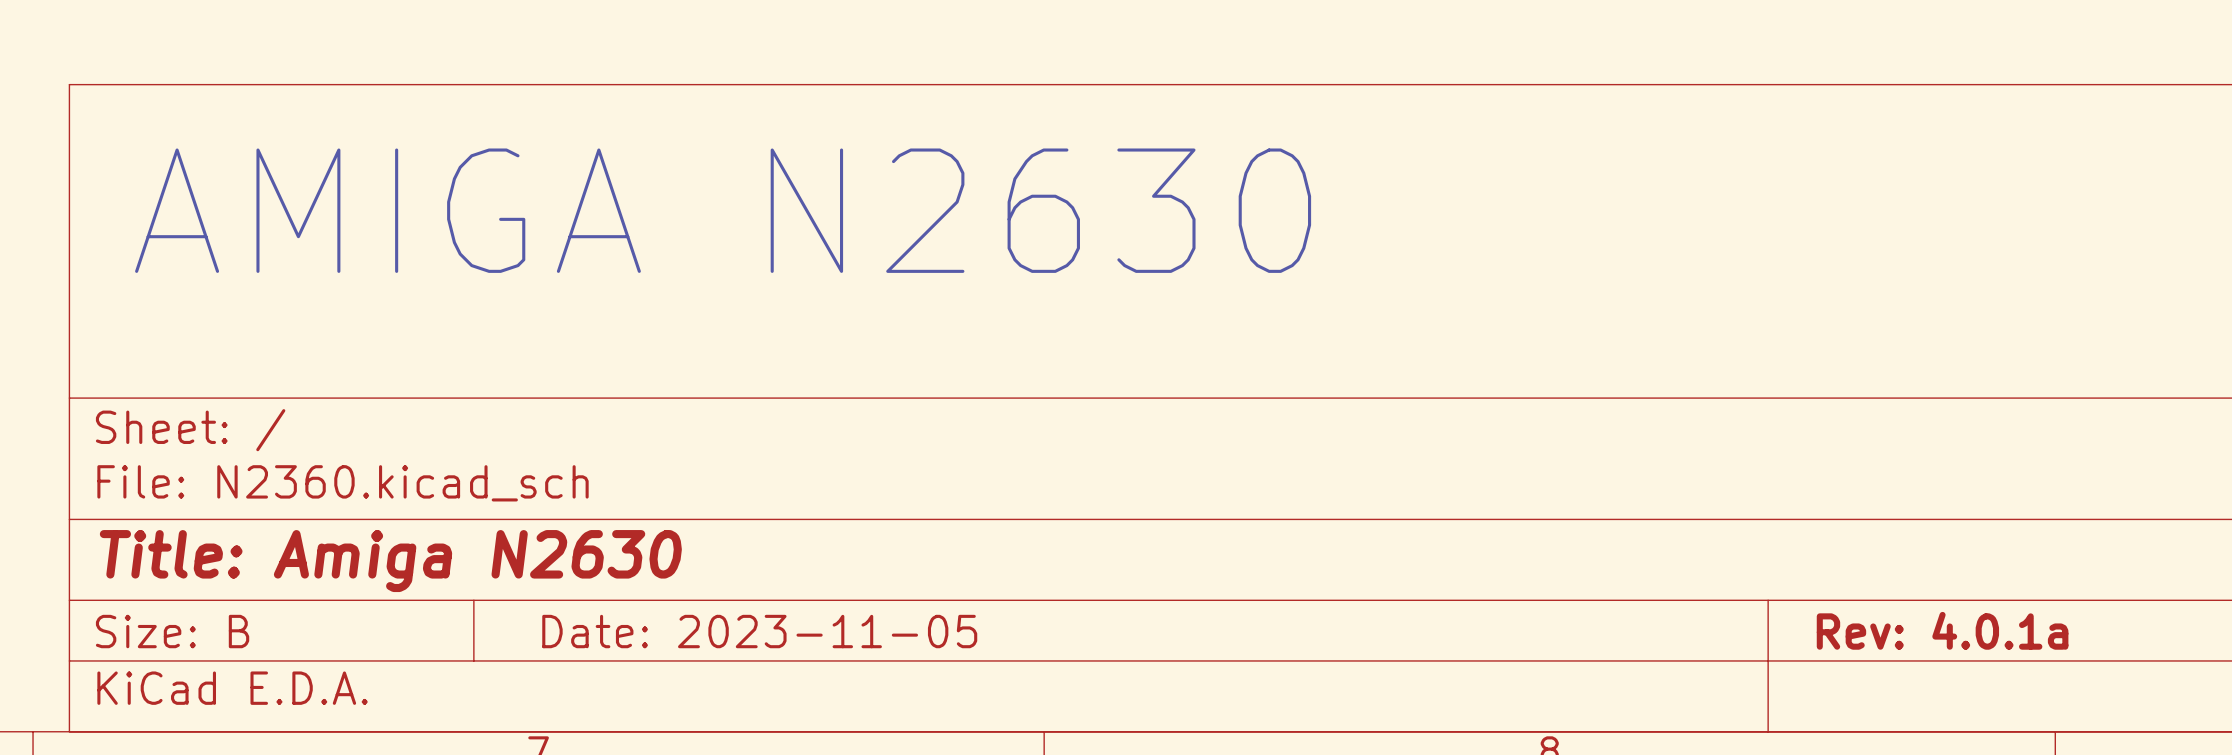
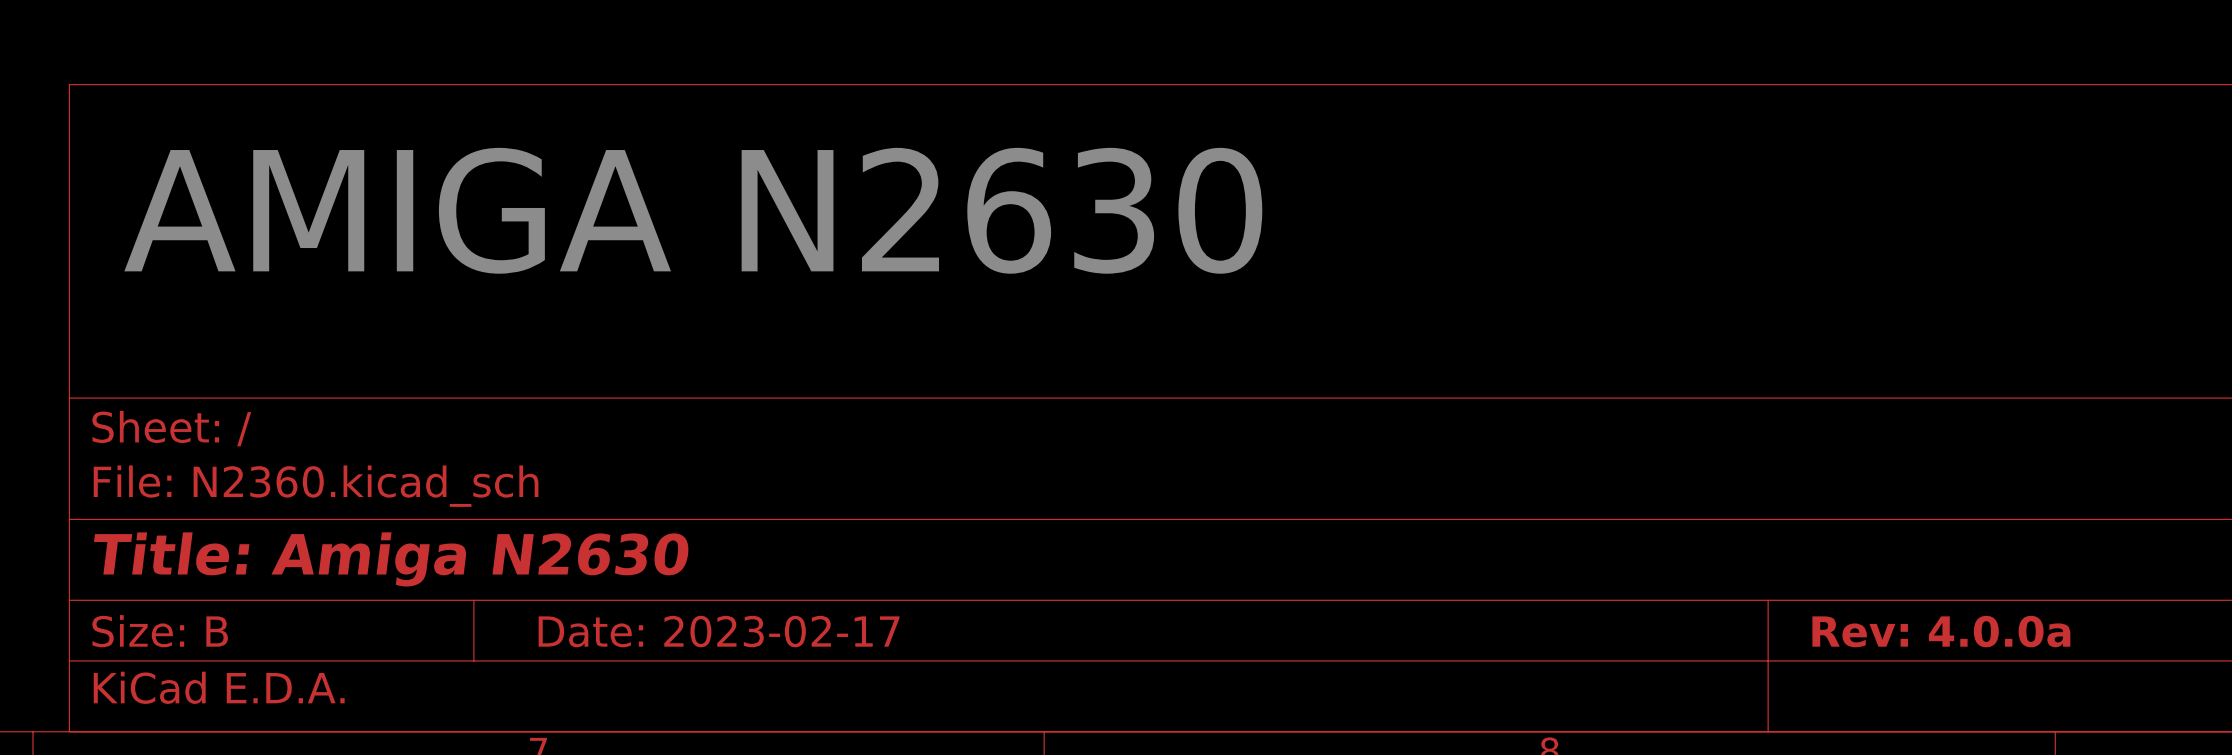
title block: Rev: 4.0.1a (1942, 630) -> Rev: 4.0.0a (1941, 631)
title block: Date: 2023-11-05 (759, 631) -> Date: 2023-02-17 (719, 631)

